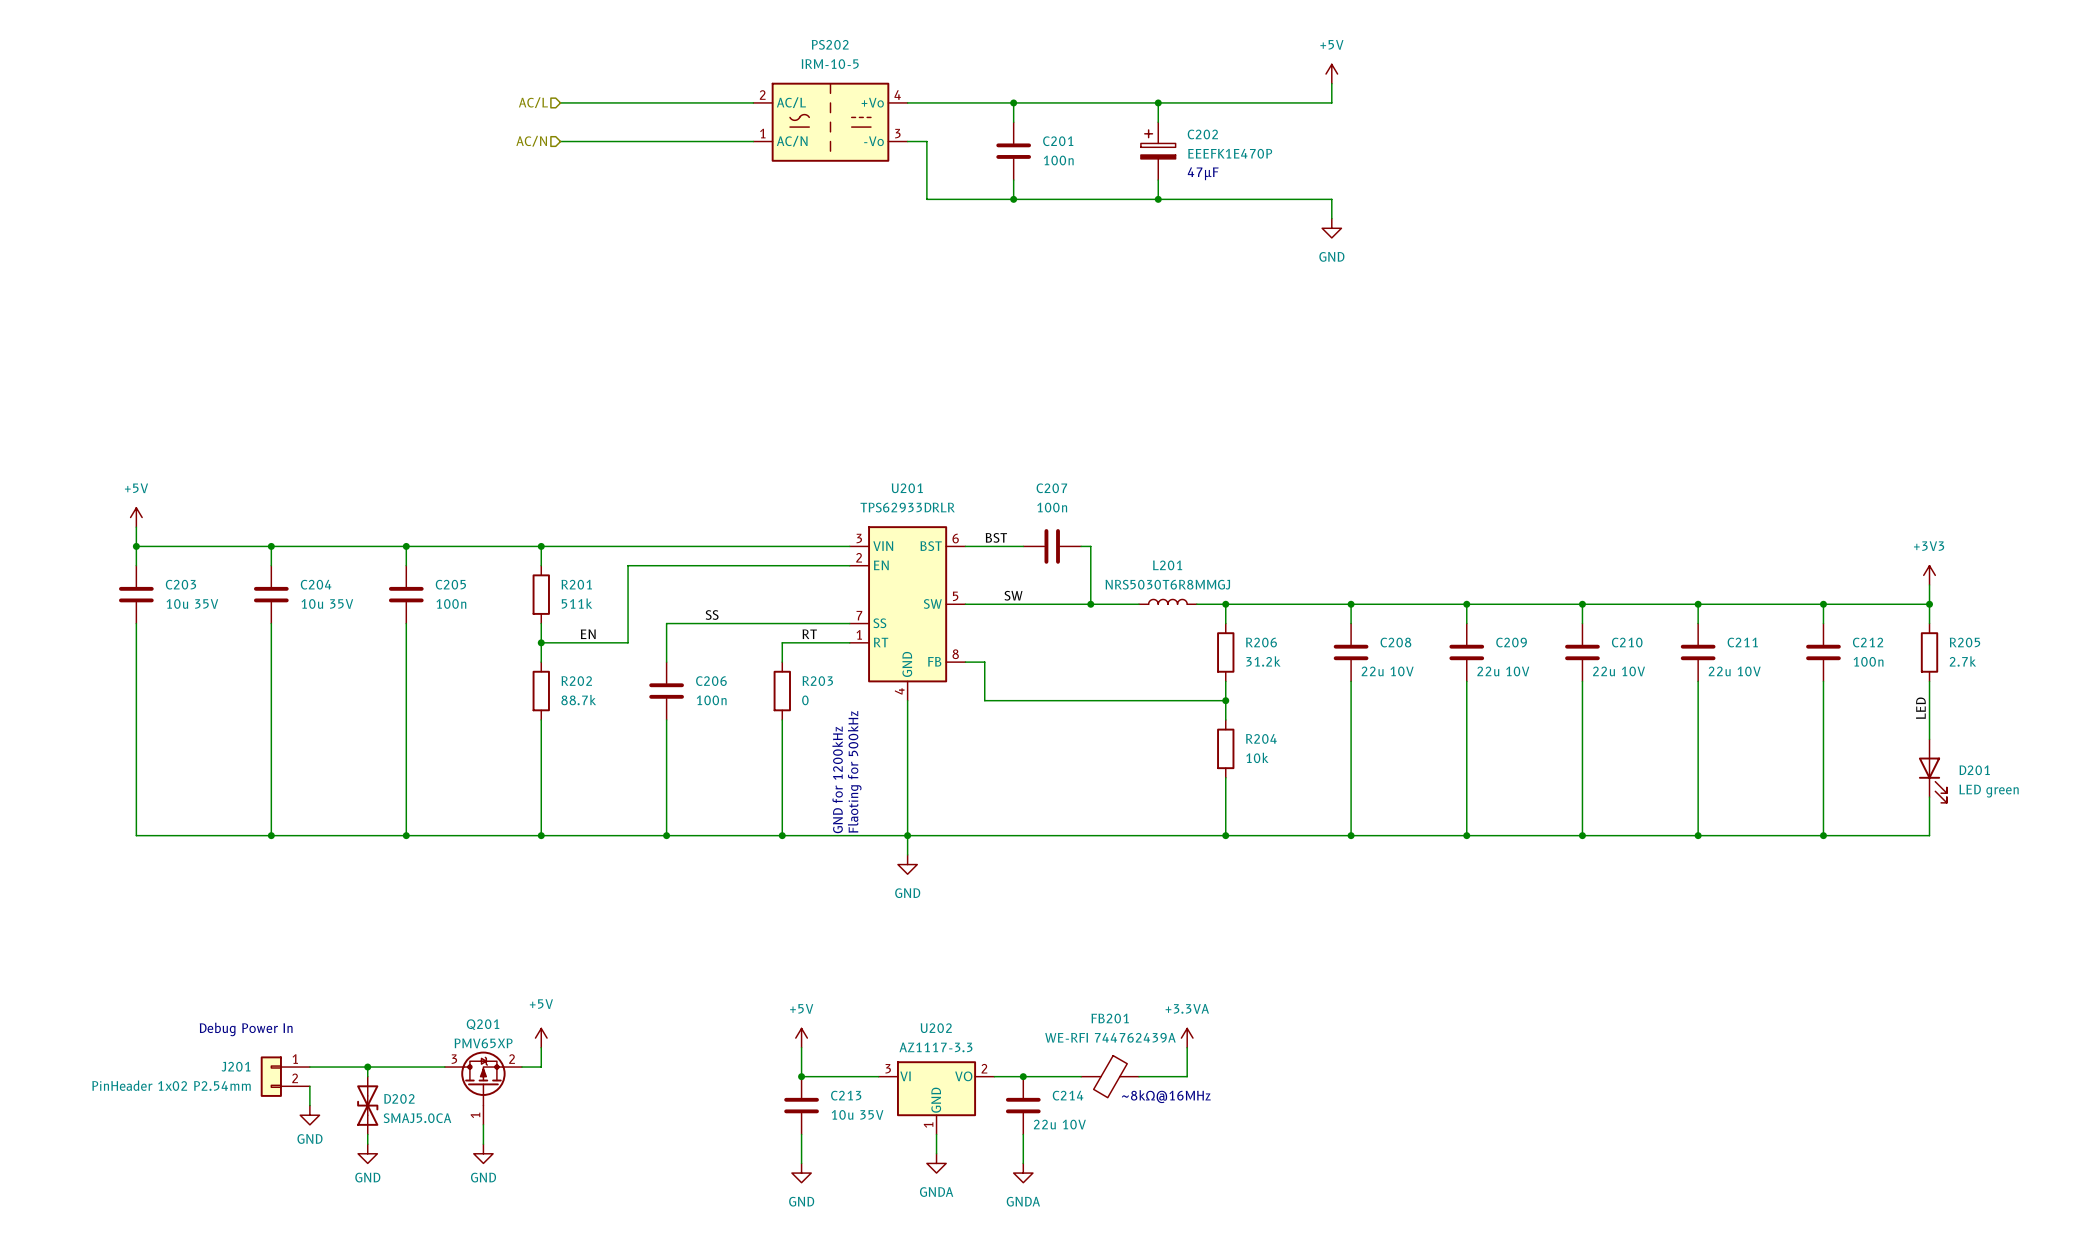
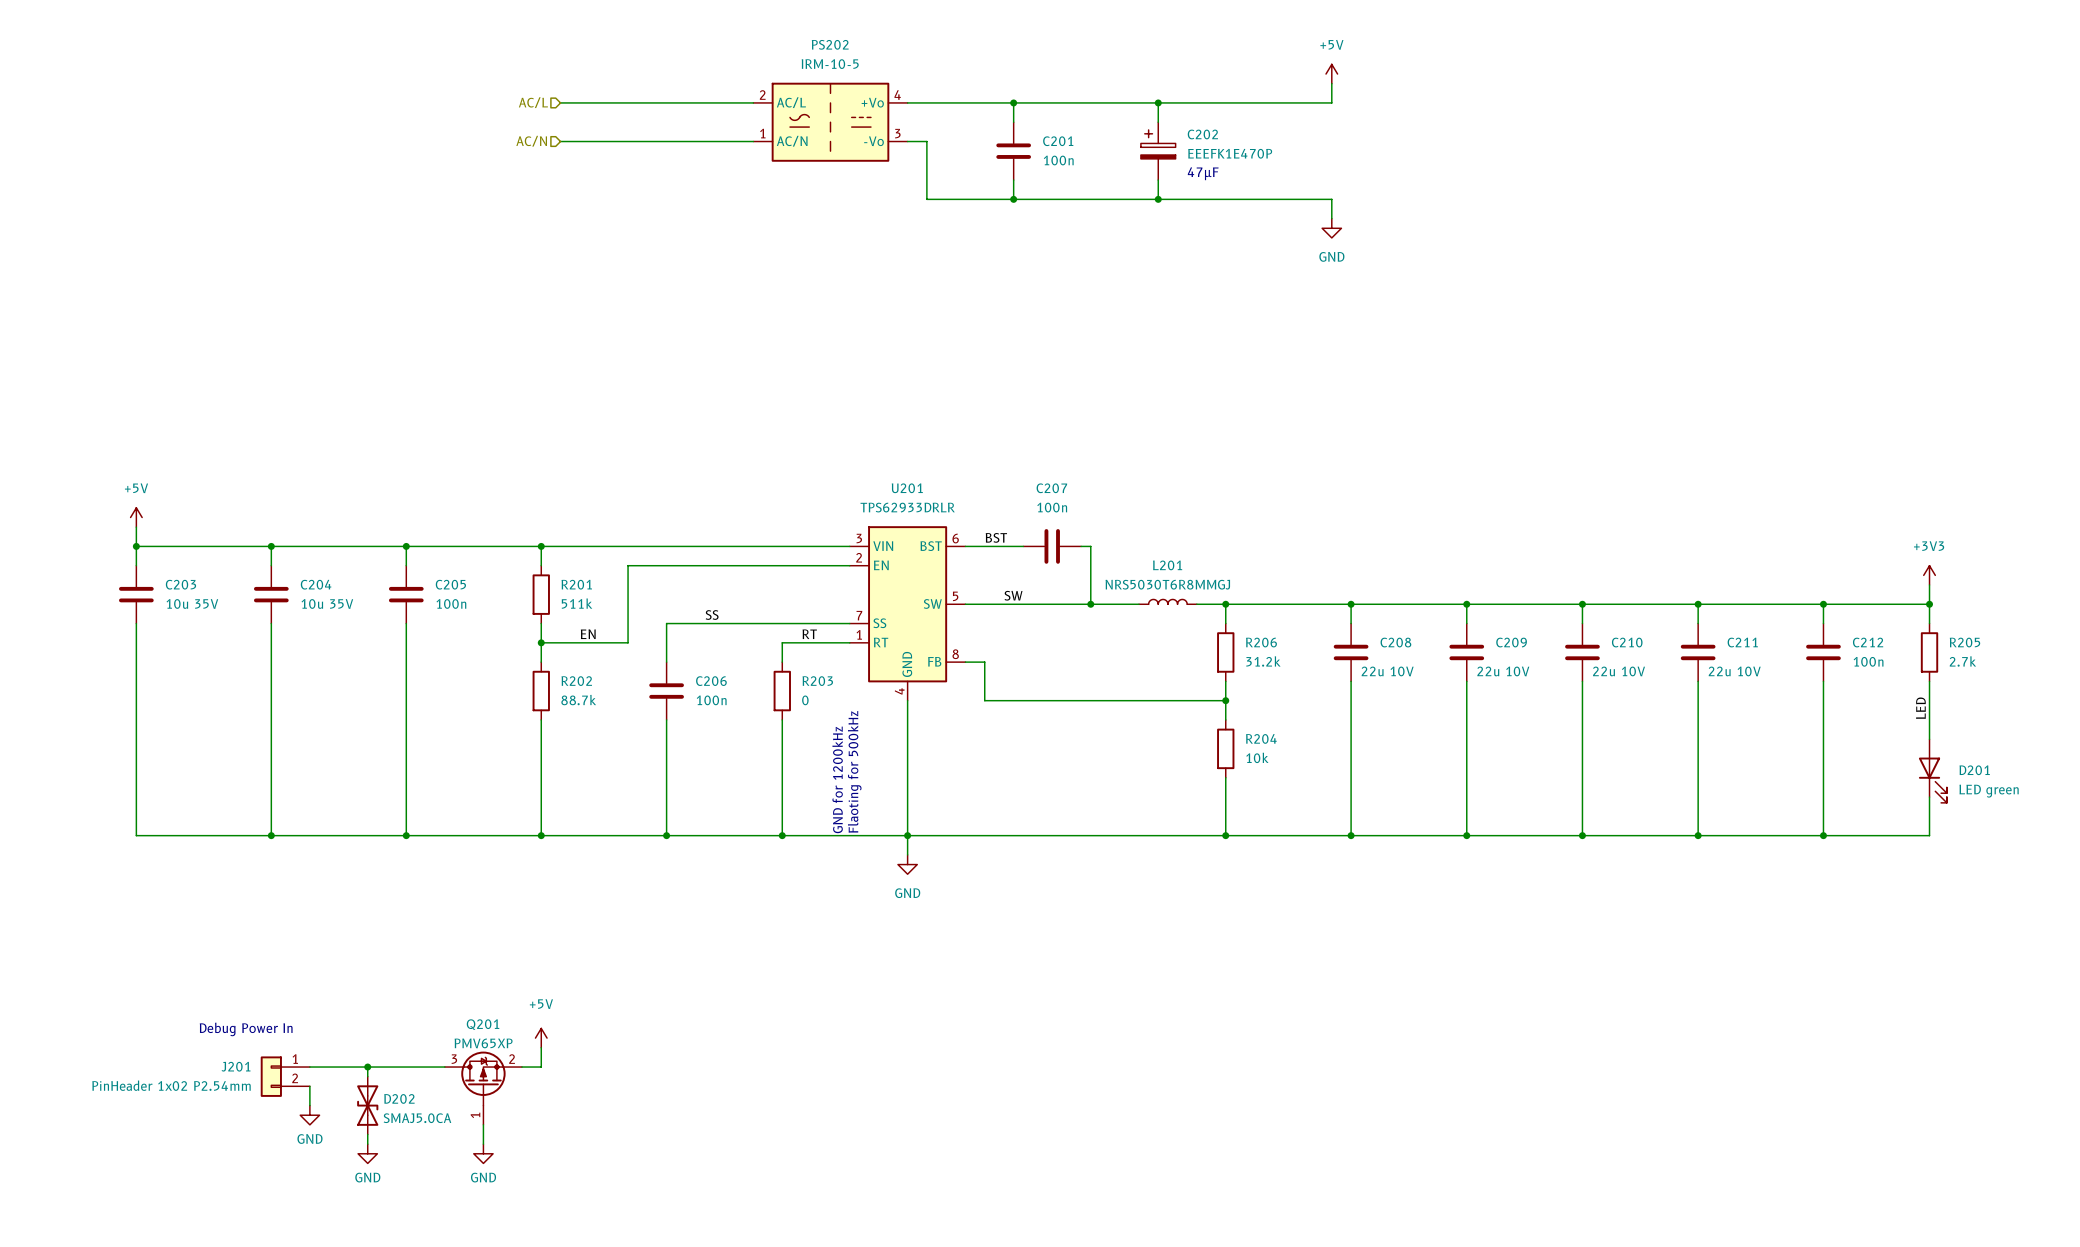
power symbol: +5V (801, 1038) -> none
power symbol: +3.3VA (1187, 1038) -> none
wire: (801, 1047) (801, 1076) (878, 1076) -> none
wire: (1187, 1047) (1187, 1076) (1138, 1076) -> none
junction: (801, 1076) -> none
wire: (994, 1076) (1081, 1076) -> none
junction: (1023, 1076) -> none
FB201: WE-RFI 744762439A (1110, 1076) -> none
text: ~8kΩ@16MHz (1166, 1096) -> none
U202: AZ1117-3.3 (936, 1097) -> none
C213: 10u 35V (801, 1105) -> none
C214: 22u 10V (1023, 1105) -> none
wire: (801, 1134) (801, 1163) -> none
wire: (936, 1134) (936, 1153) -> none
wire: (1023, 1134) (1023, 1163) -> none
power symbol: GNDA (936, 1163) -> none
power symbol: GND (801, 1173) -> none
power symbol: GNDA (1023, 1173) -> none

